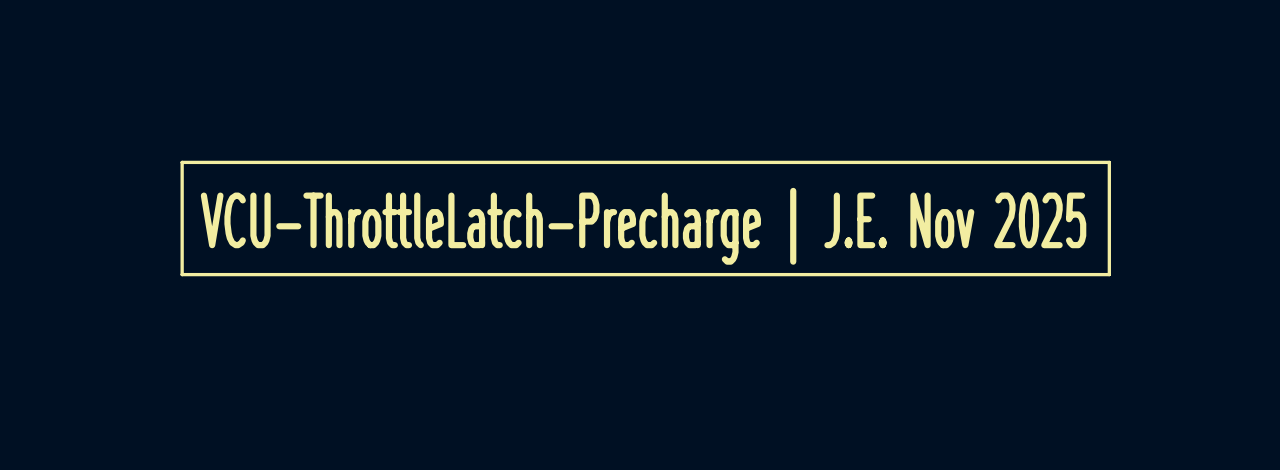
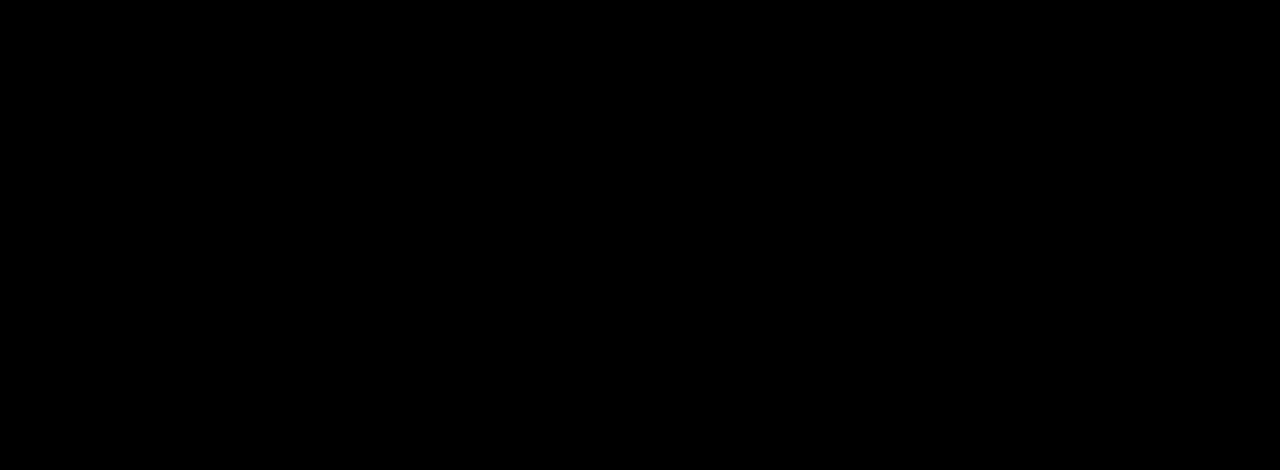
line: (182, 162) (1109, 162) (1109, 274) (182, 274) (182, 162) -> none
text: VCU-ThrottleLatch-Precharge | J.E. Nov 2025 (643, 226) -> none

